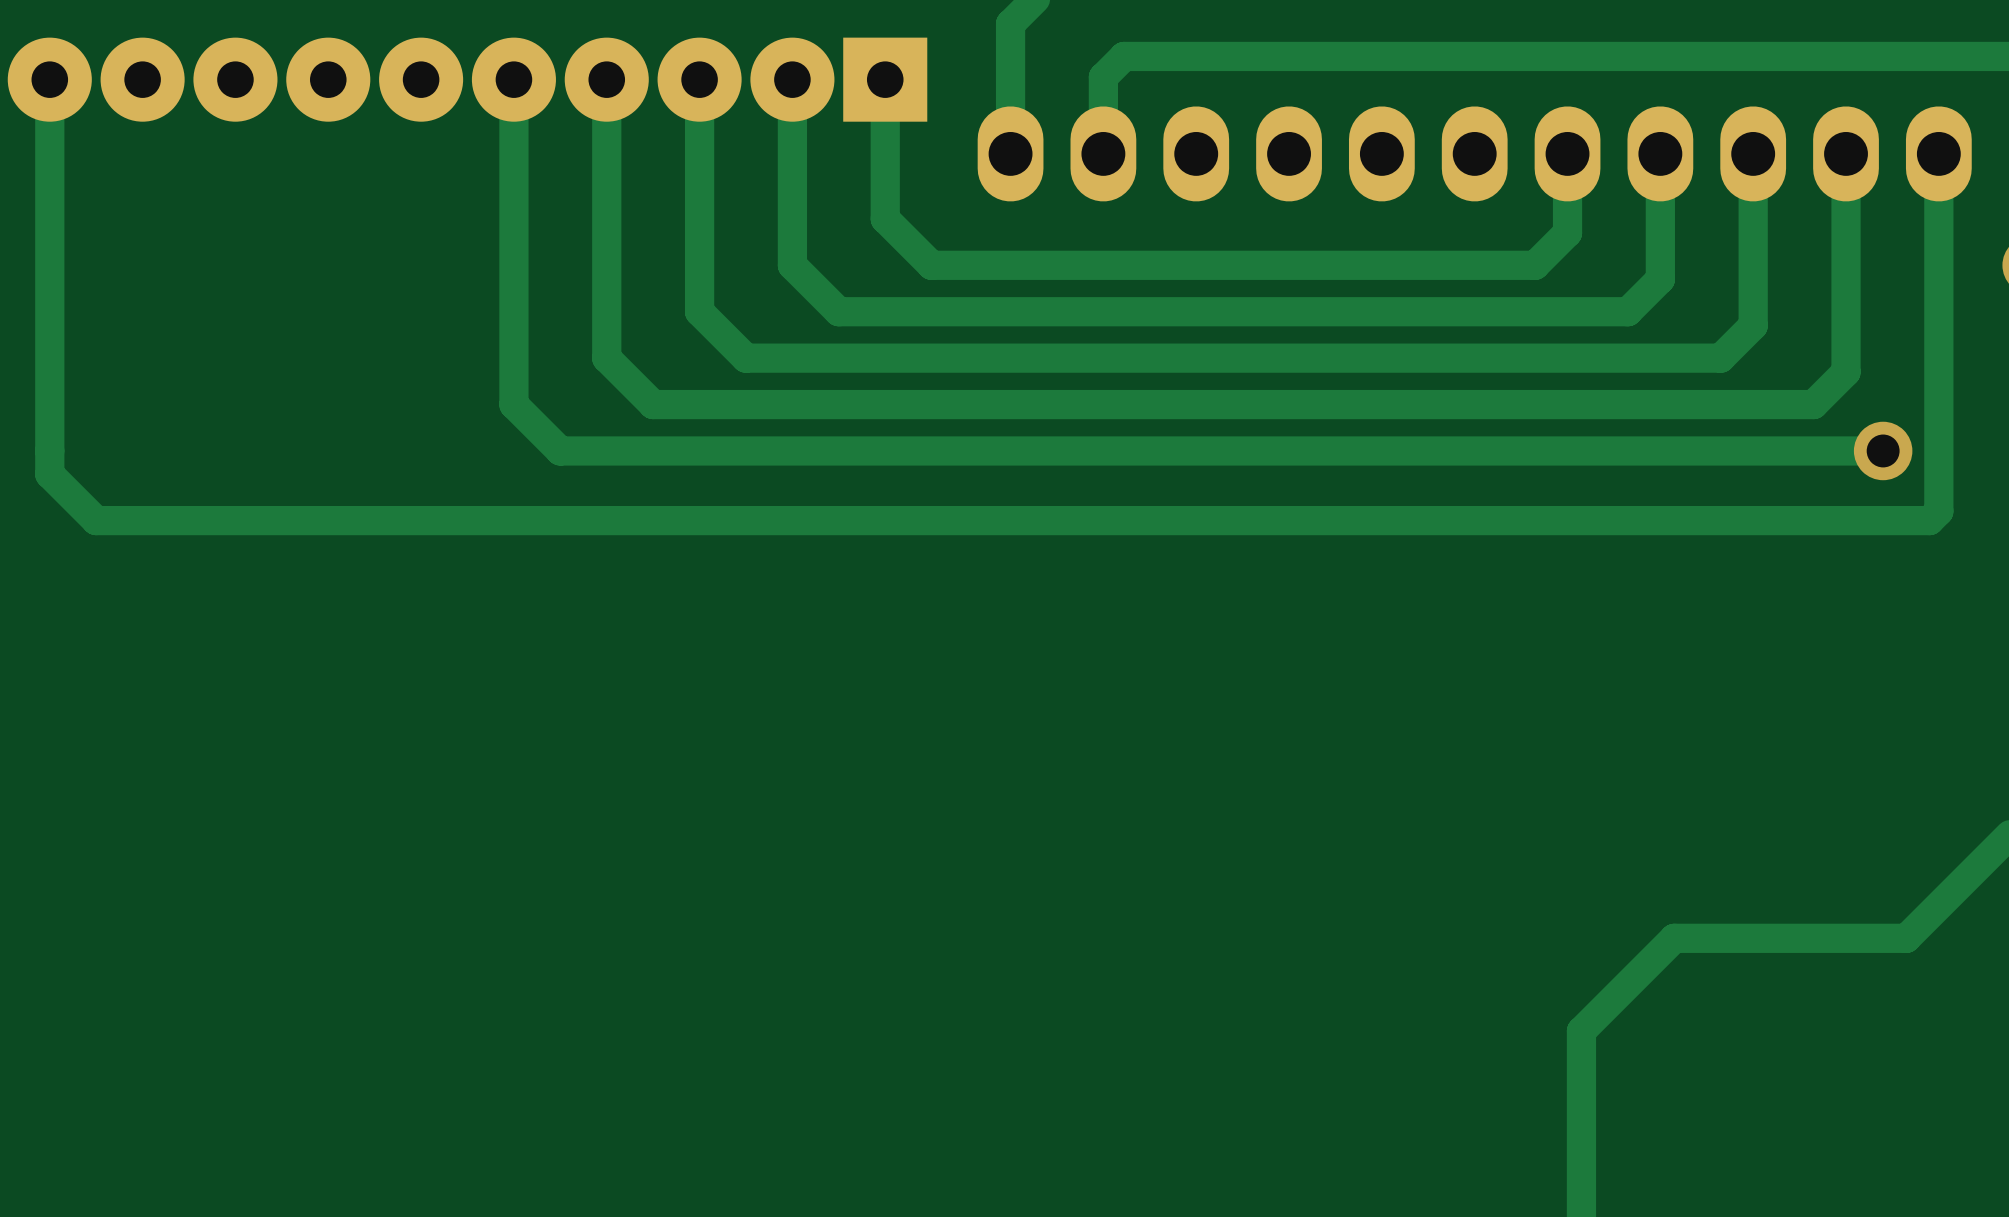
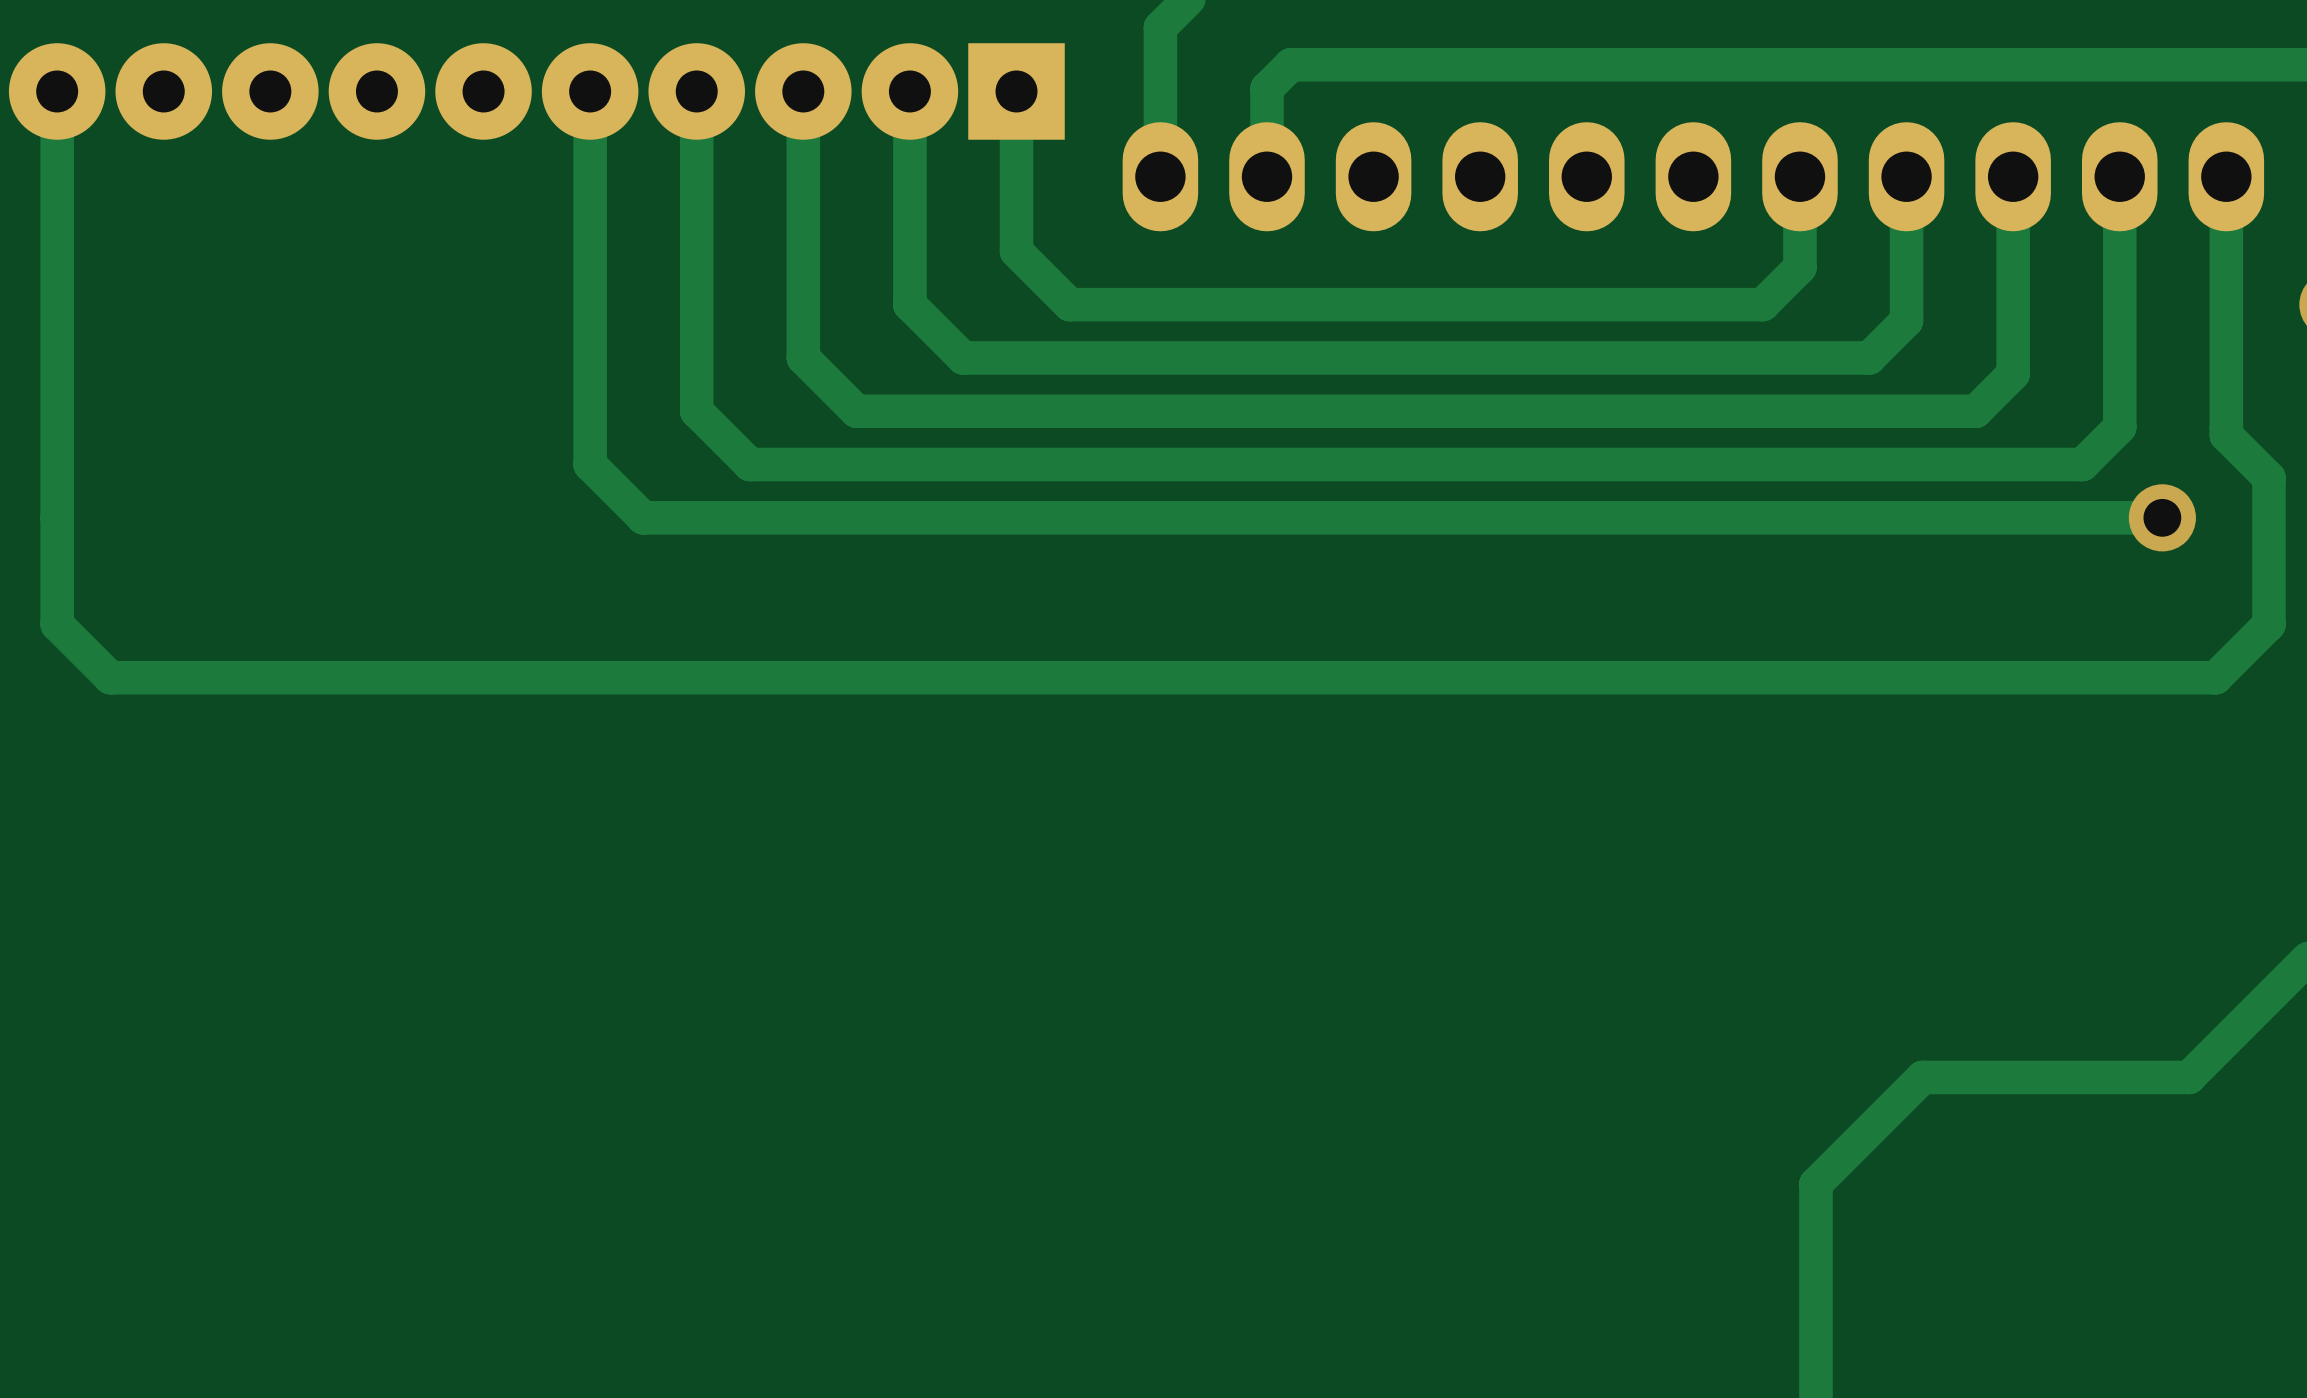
track: (1938, 379) (1938, 511) (1929, 520) (96, 520) (49, 474) -> (2226, 435) (2268, 477) (2268, 624) (2215, 677) (110, 677) (57, 624) (57, 544)

